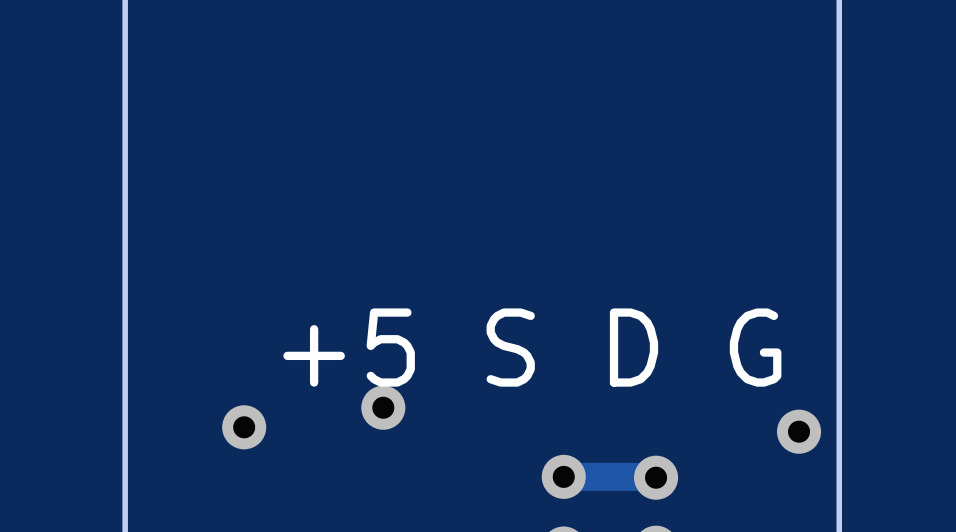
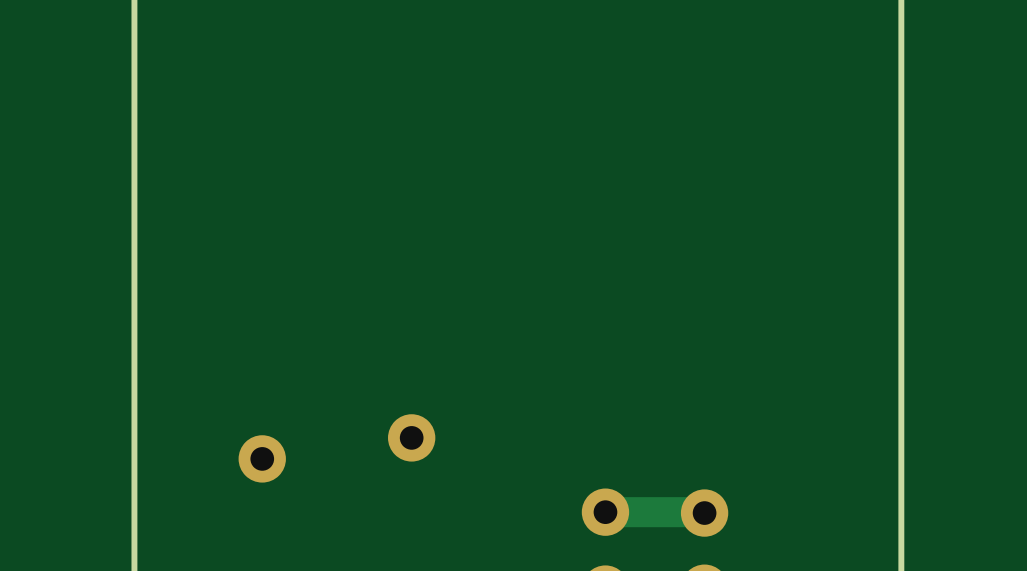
text: +5 S D G (532, 347) -> none
via: (799, 431) -> none

